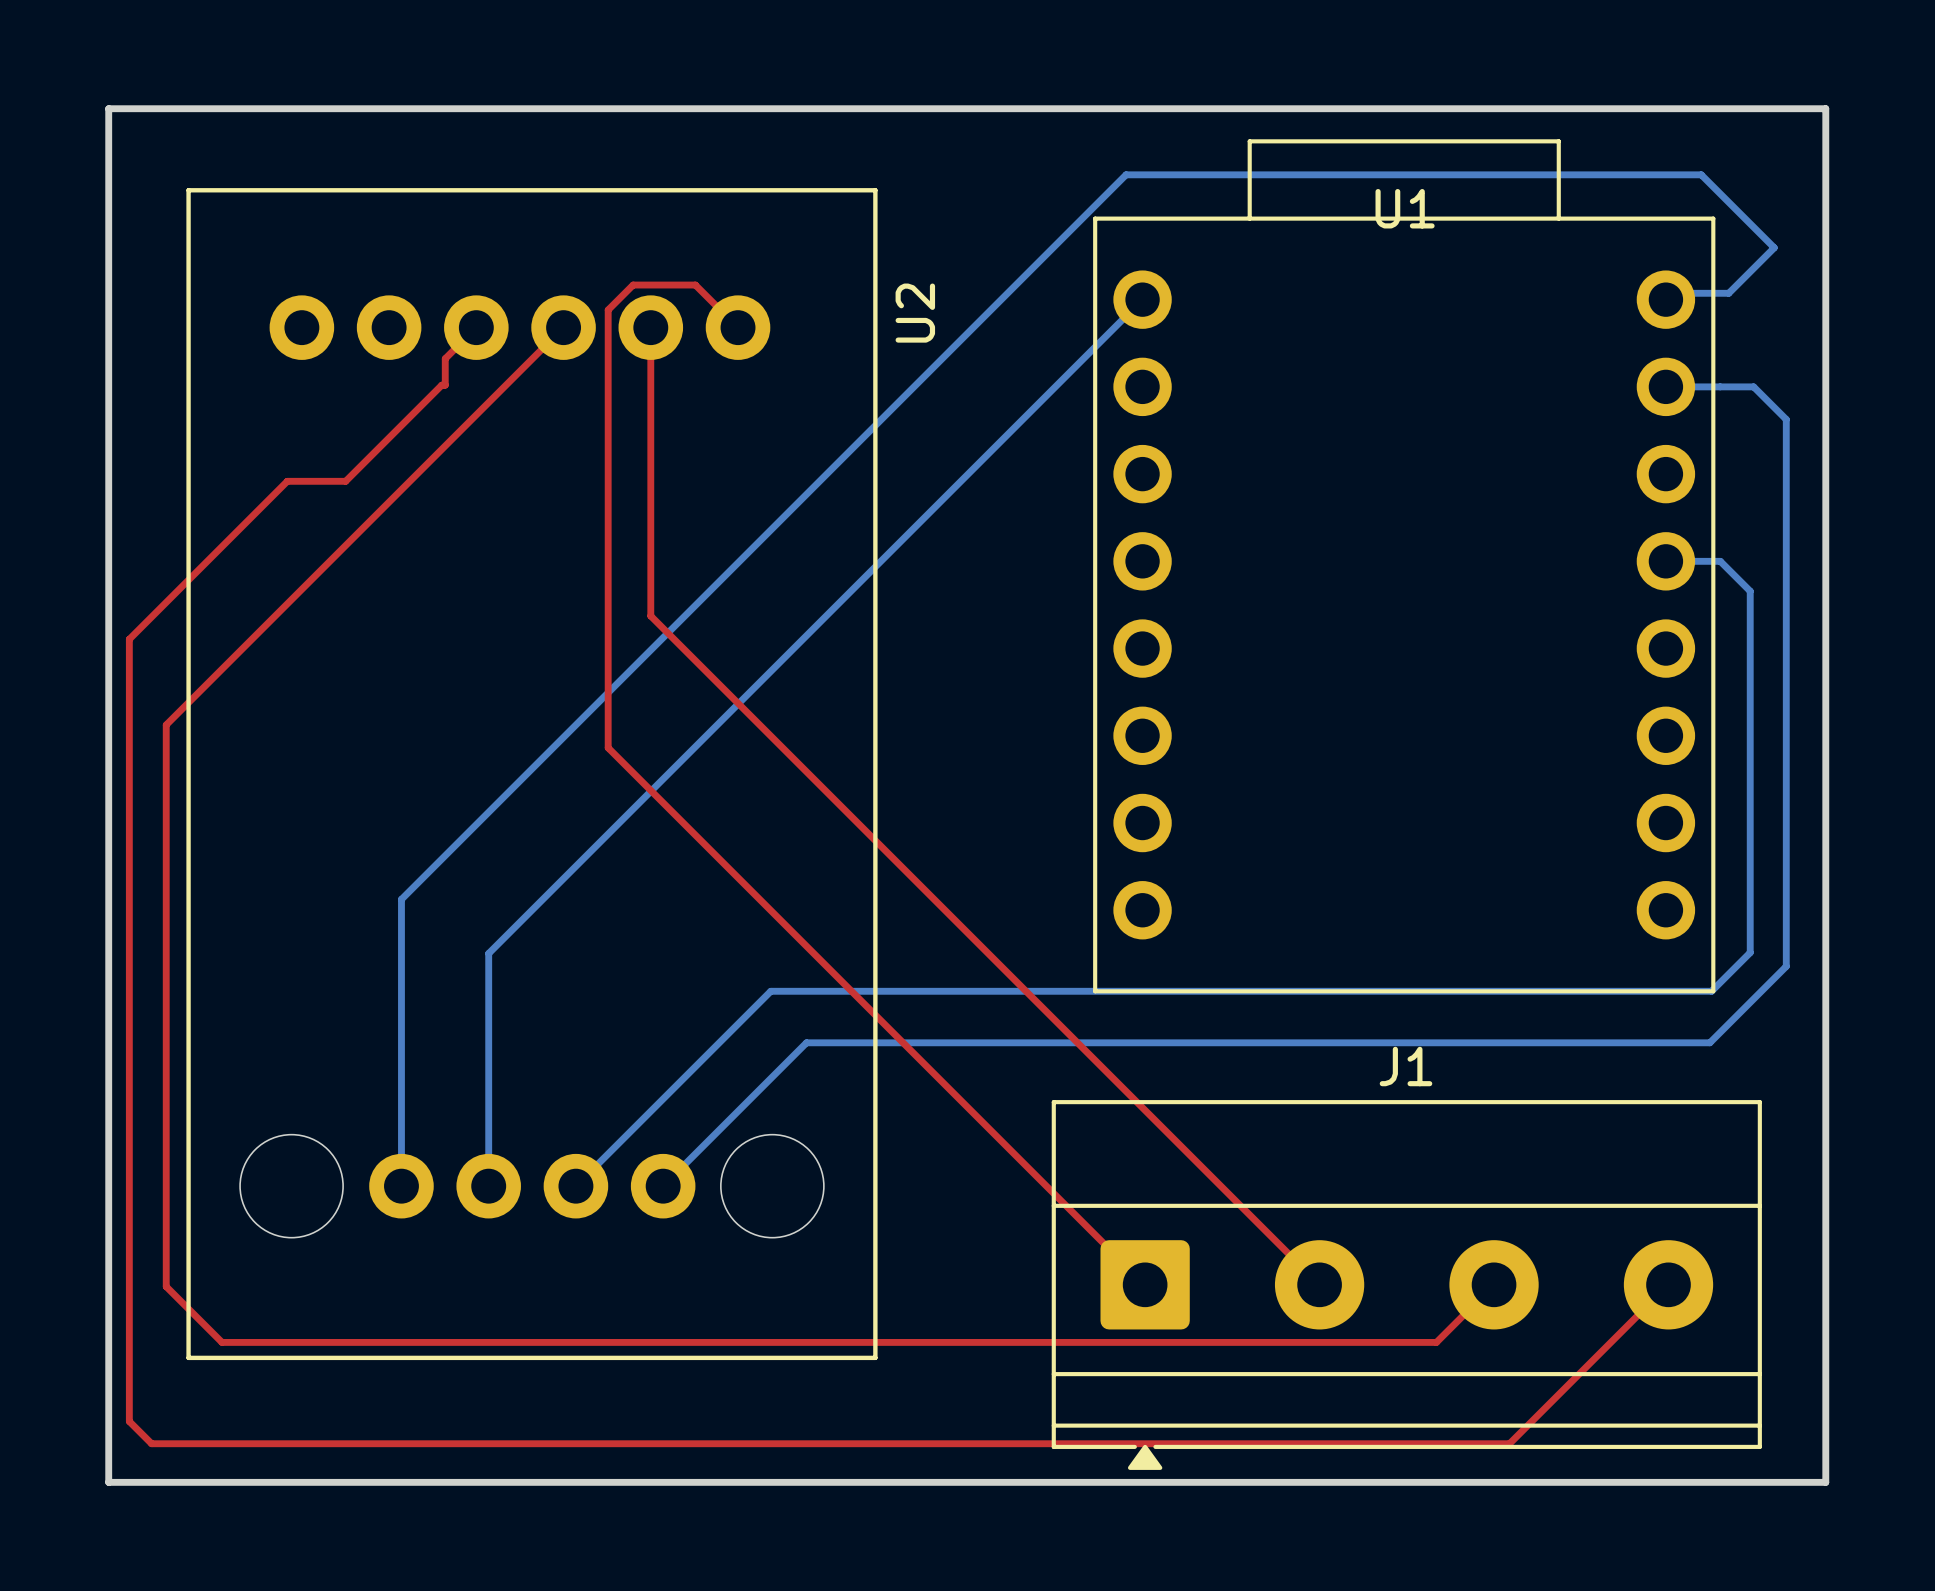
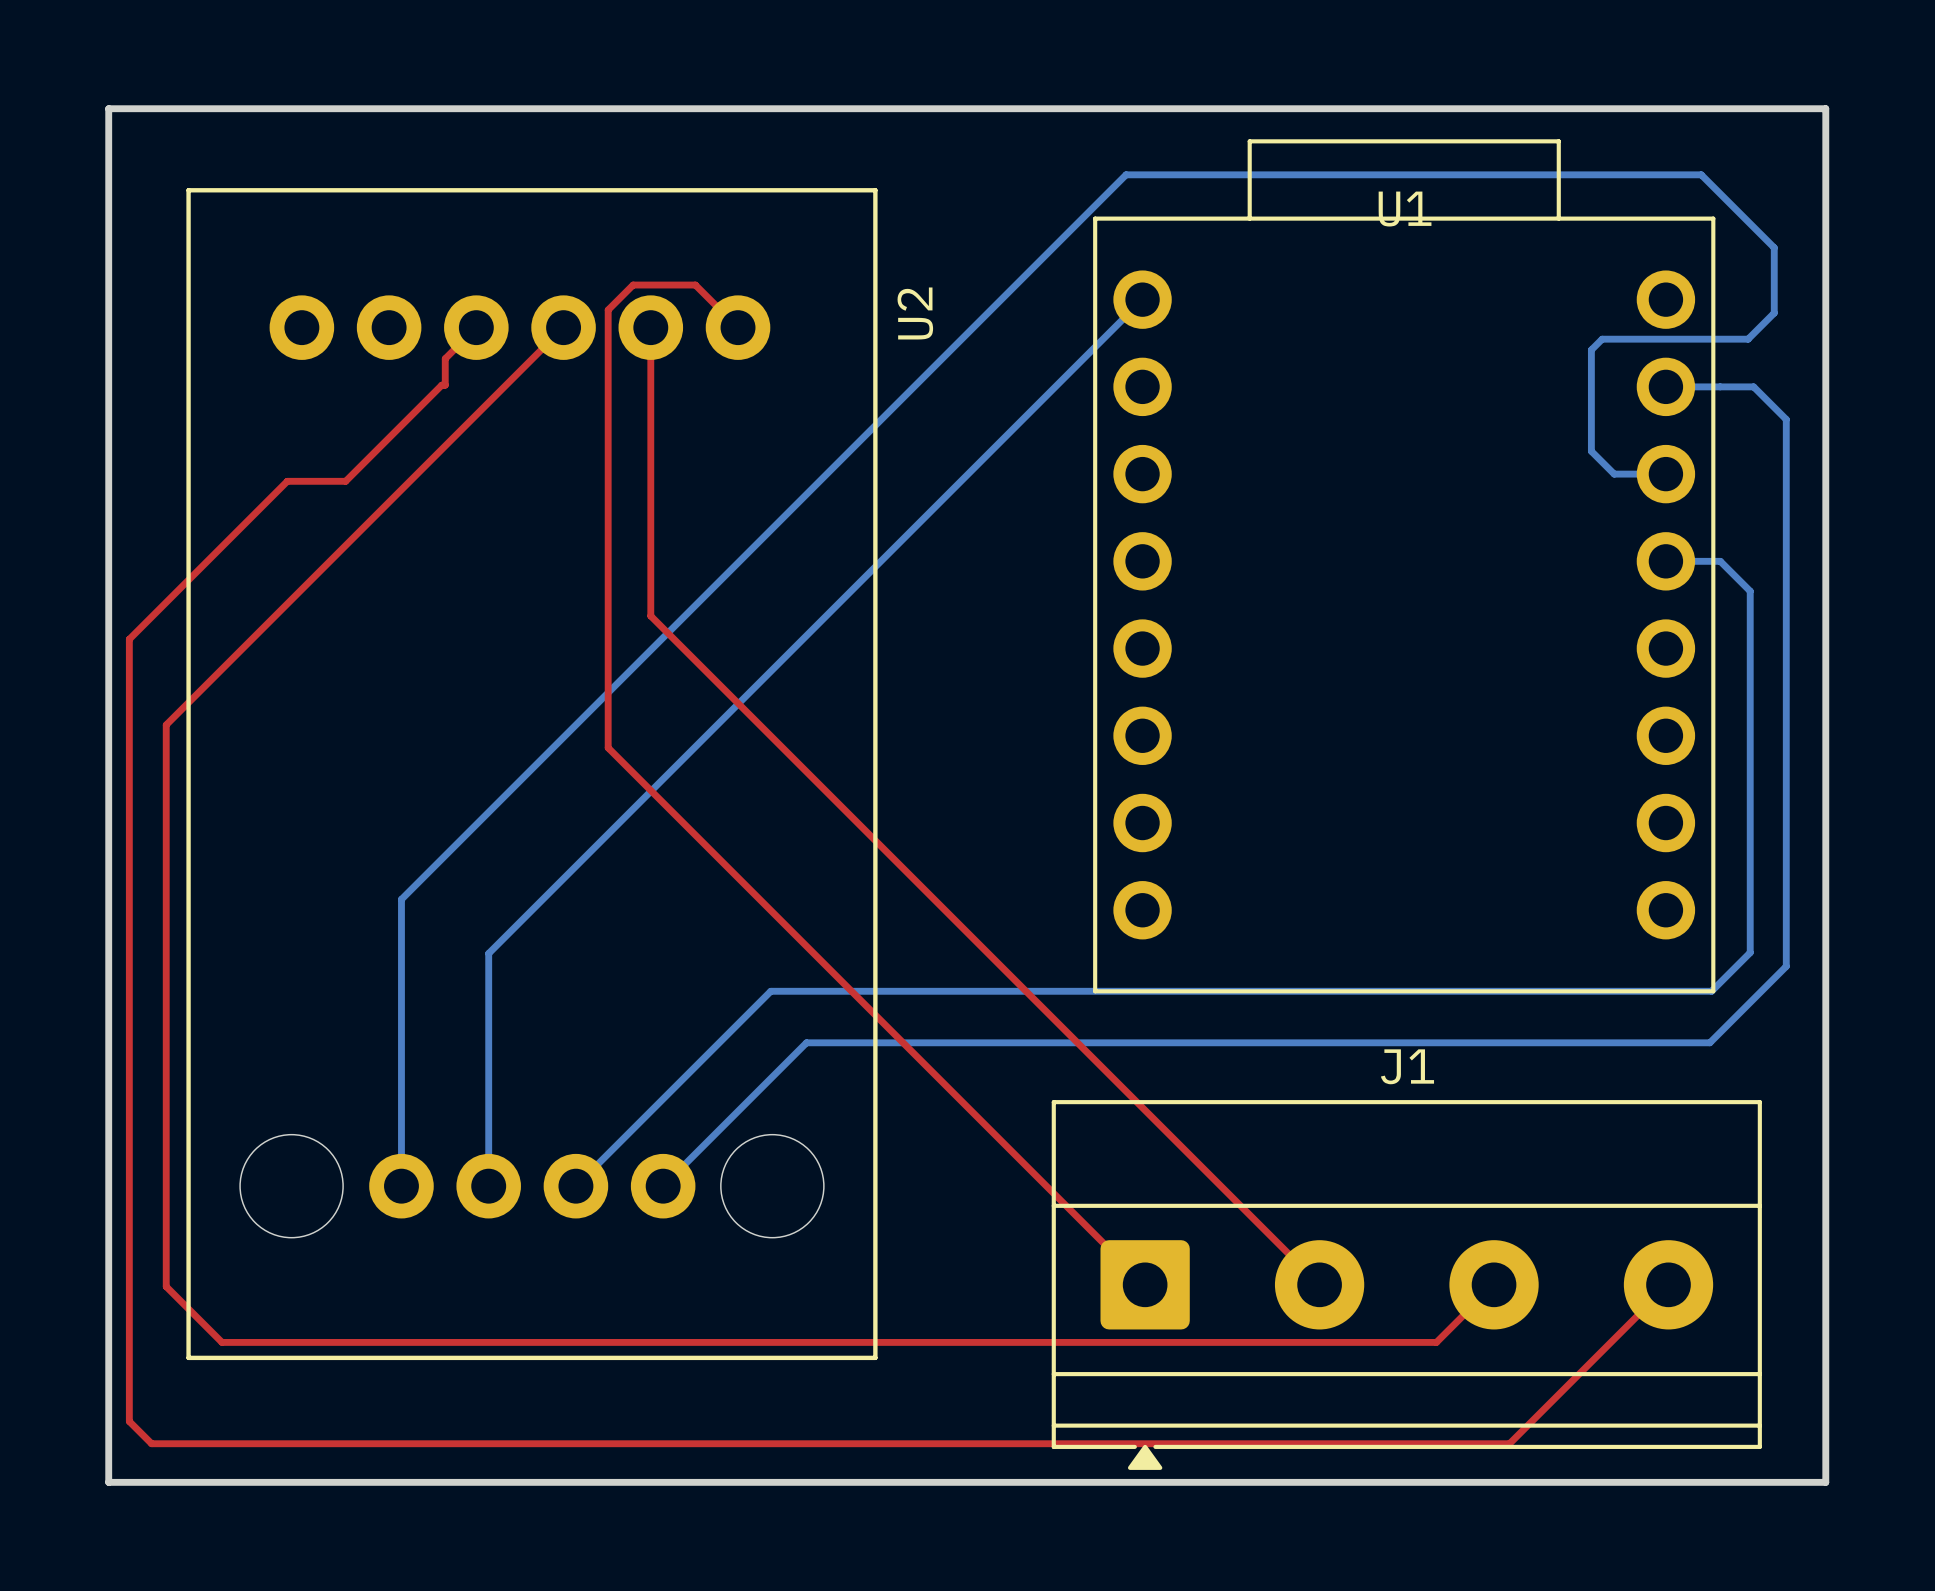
bottom track: (1774, 247) (1728, 293) (1672, 293) -> (1774, 247) (1774, 313) (1748, 339) (1602, 339) (1591, 349) (1591, 451) (1614, 474) (1665, 474)

